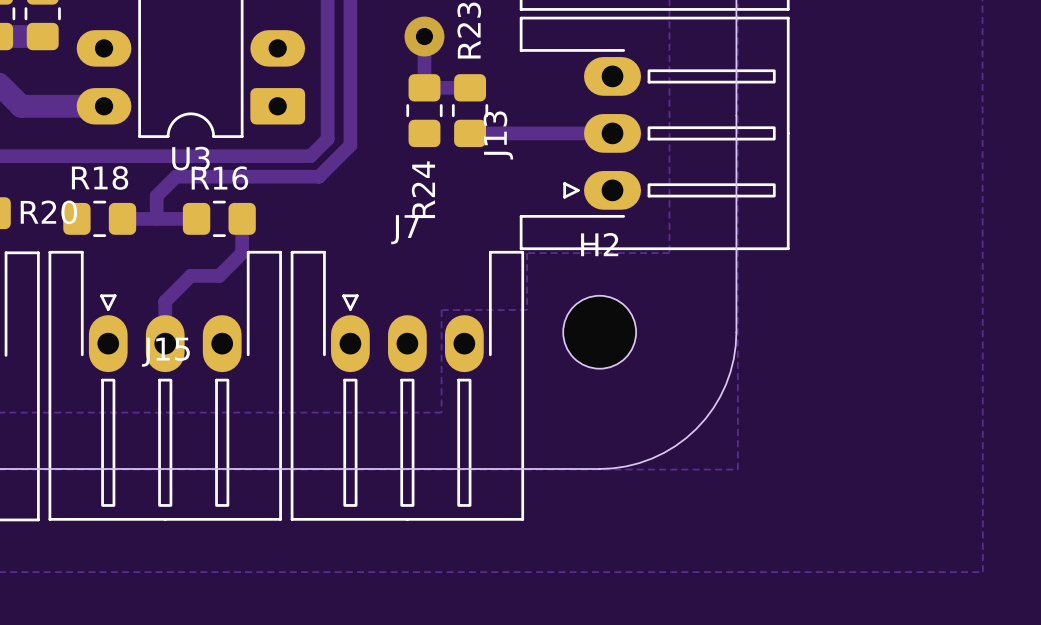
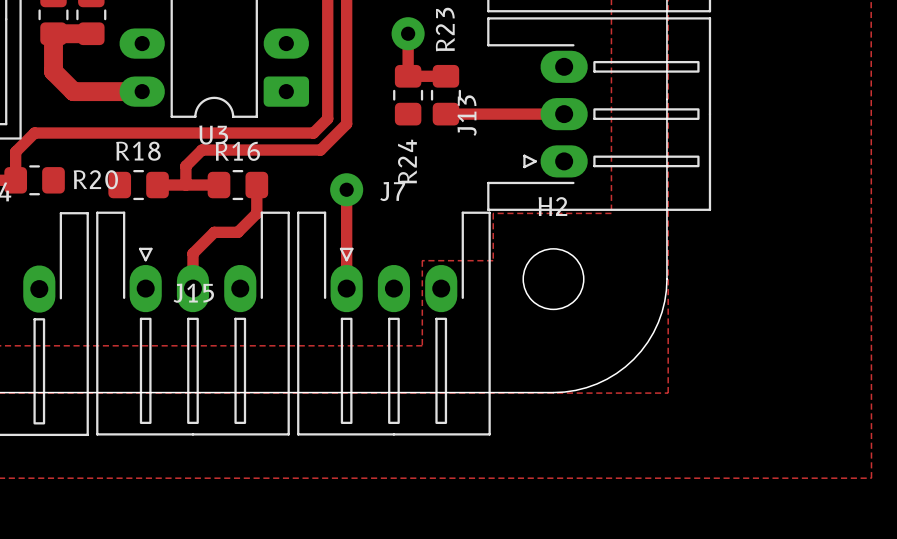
track: none -> (346, 189) (346, 288)
via: none -> (346, 189)

